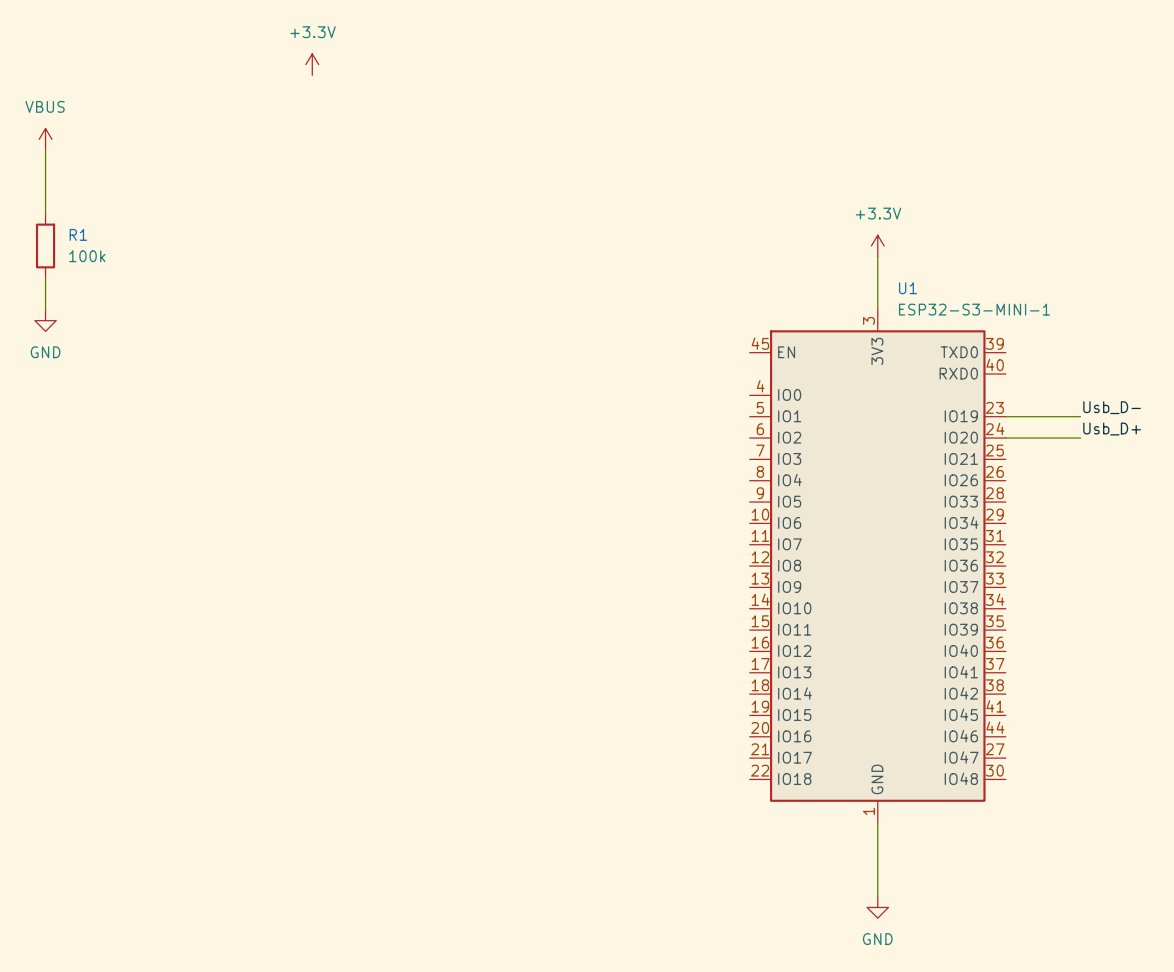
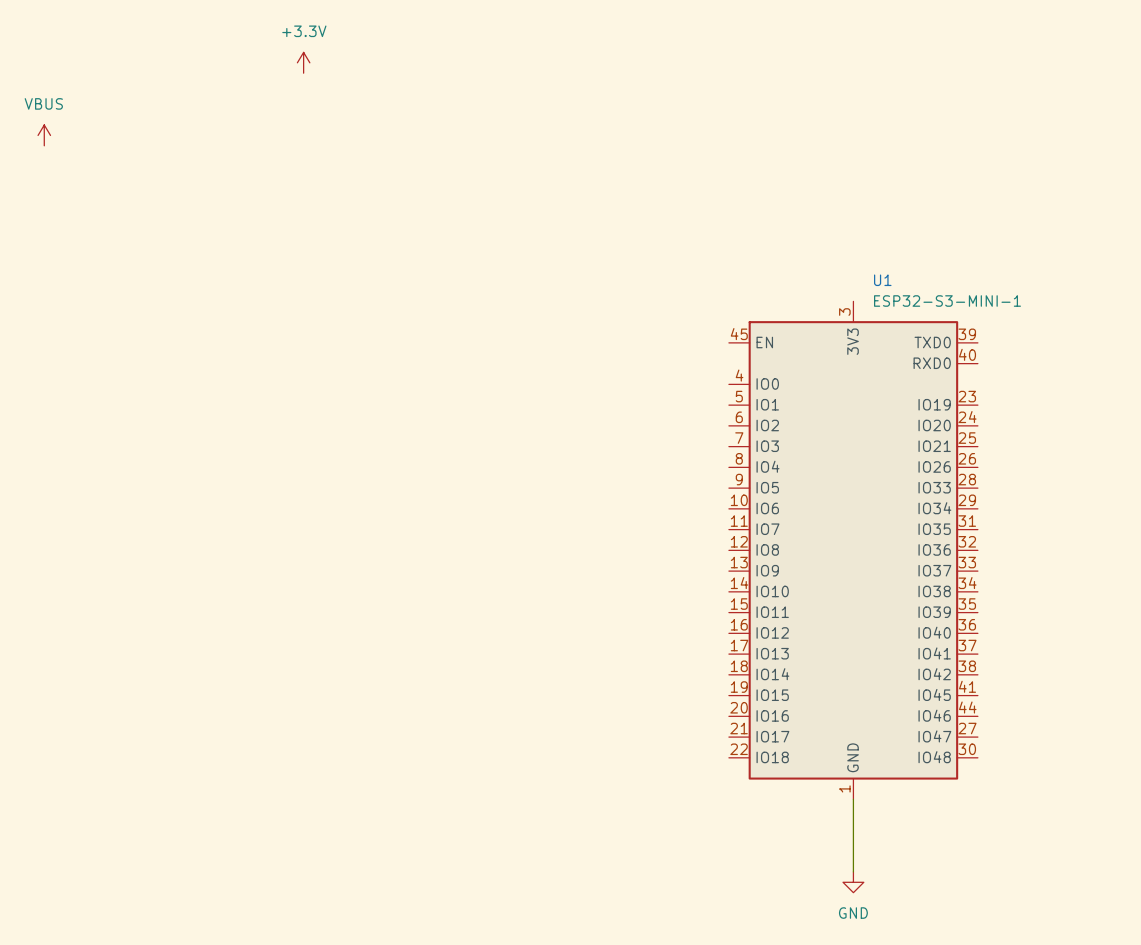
wire: (45, 149) (45, 213) -> none
R1: 100k (45, 245) -> none
power symbol: +3.3V (877, 245) -> none
wire: (877, 256) (877, 309) -> none
wire: (45, 277) (45, 309) -> none
power symbol: GND (45, 320) -> none
label: Usb_D- (1112, 407) -> none
wire: (1005, 416) (1080, 416) -> none
label: Usb_D+ (1112, 429) -> none
wire: (1005, 438) (1080, 438) -> none

